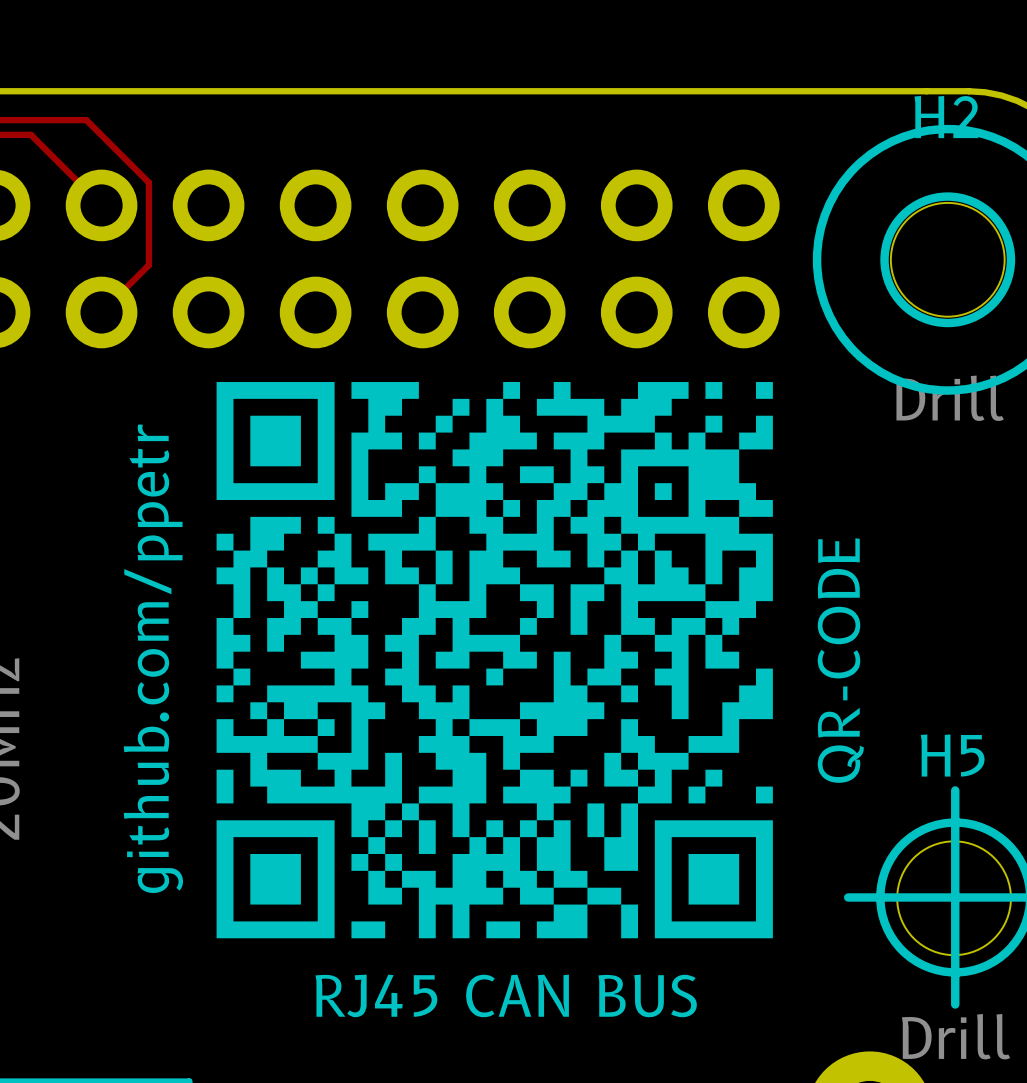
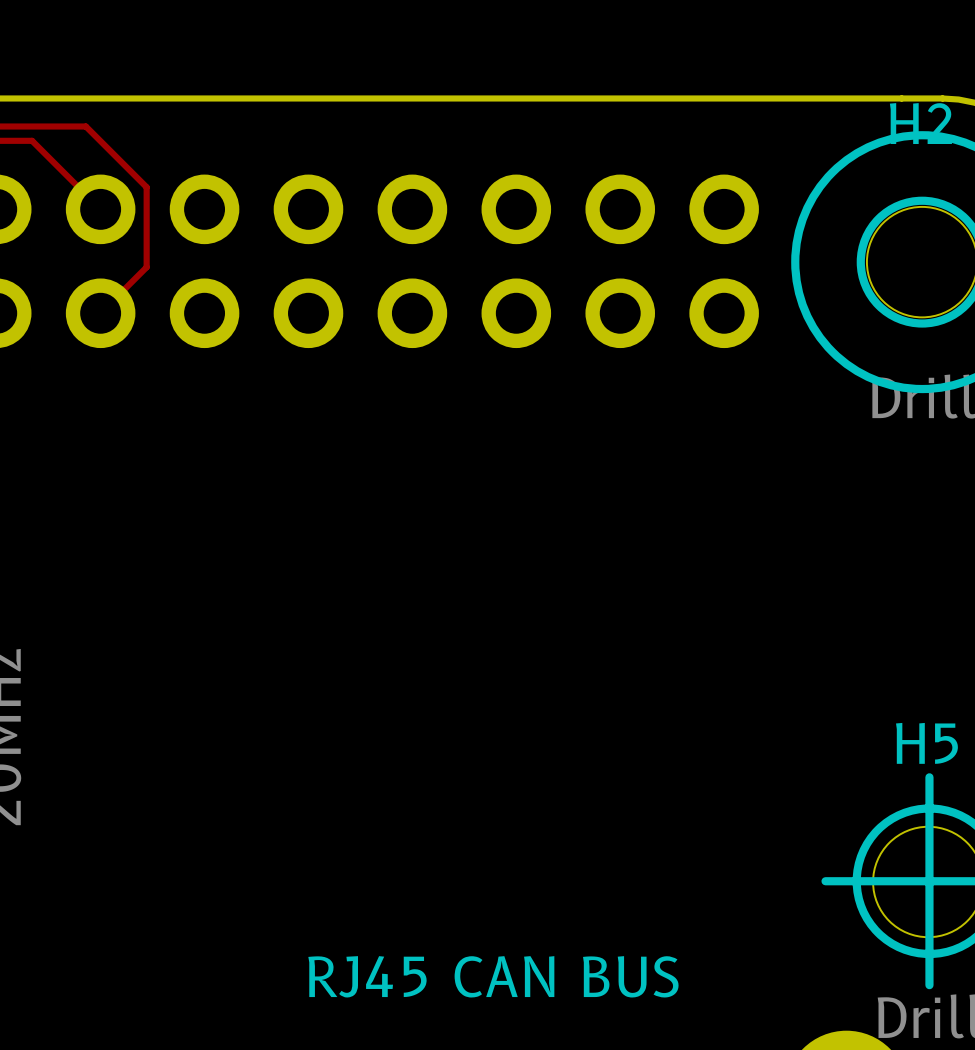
QR-CODE: github.com/ppetr (494, 660) -> none

